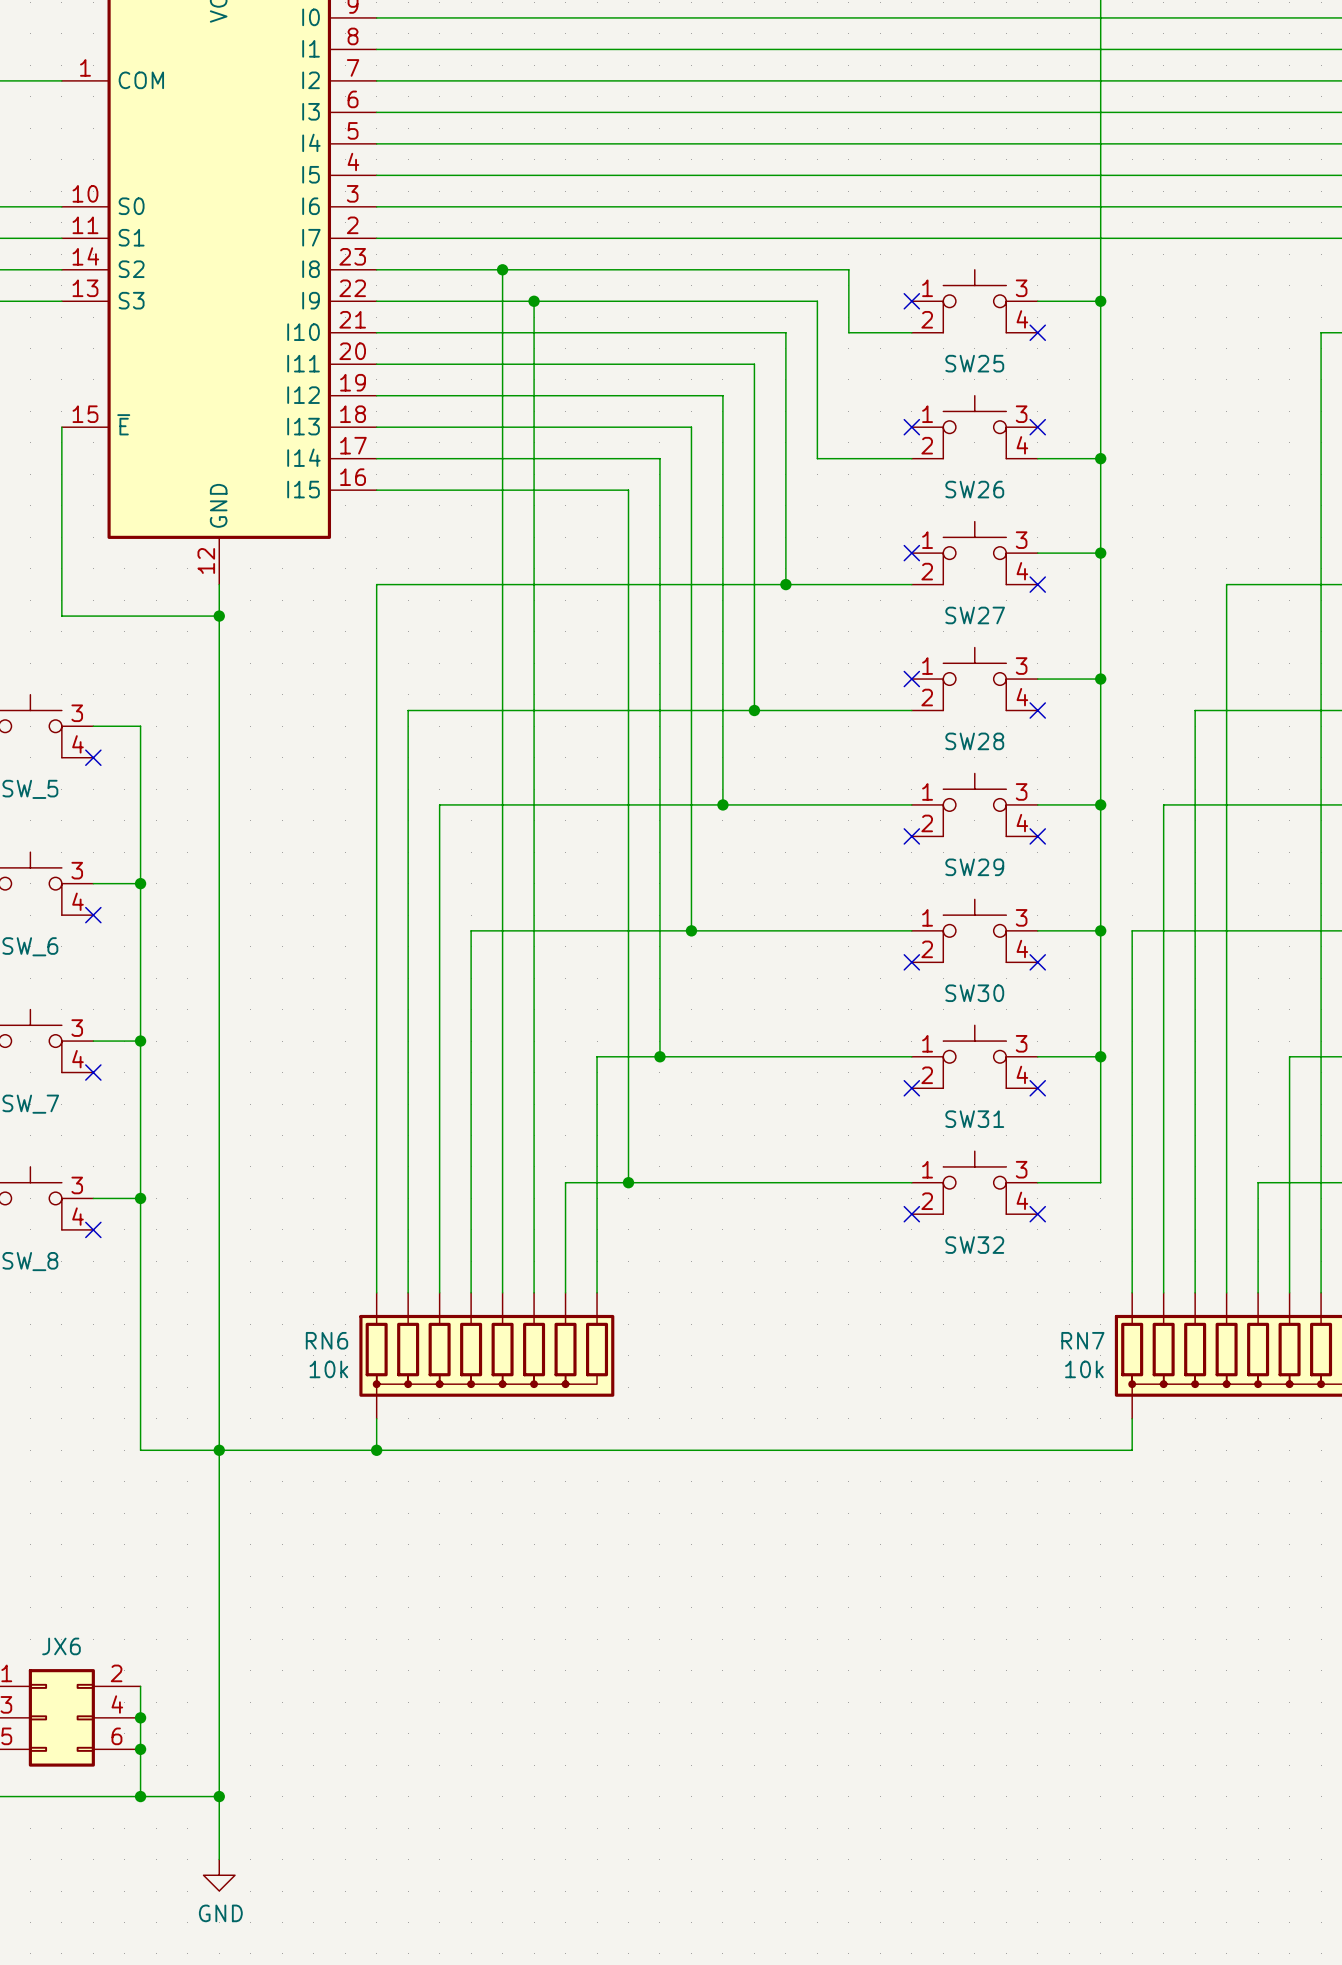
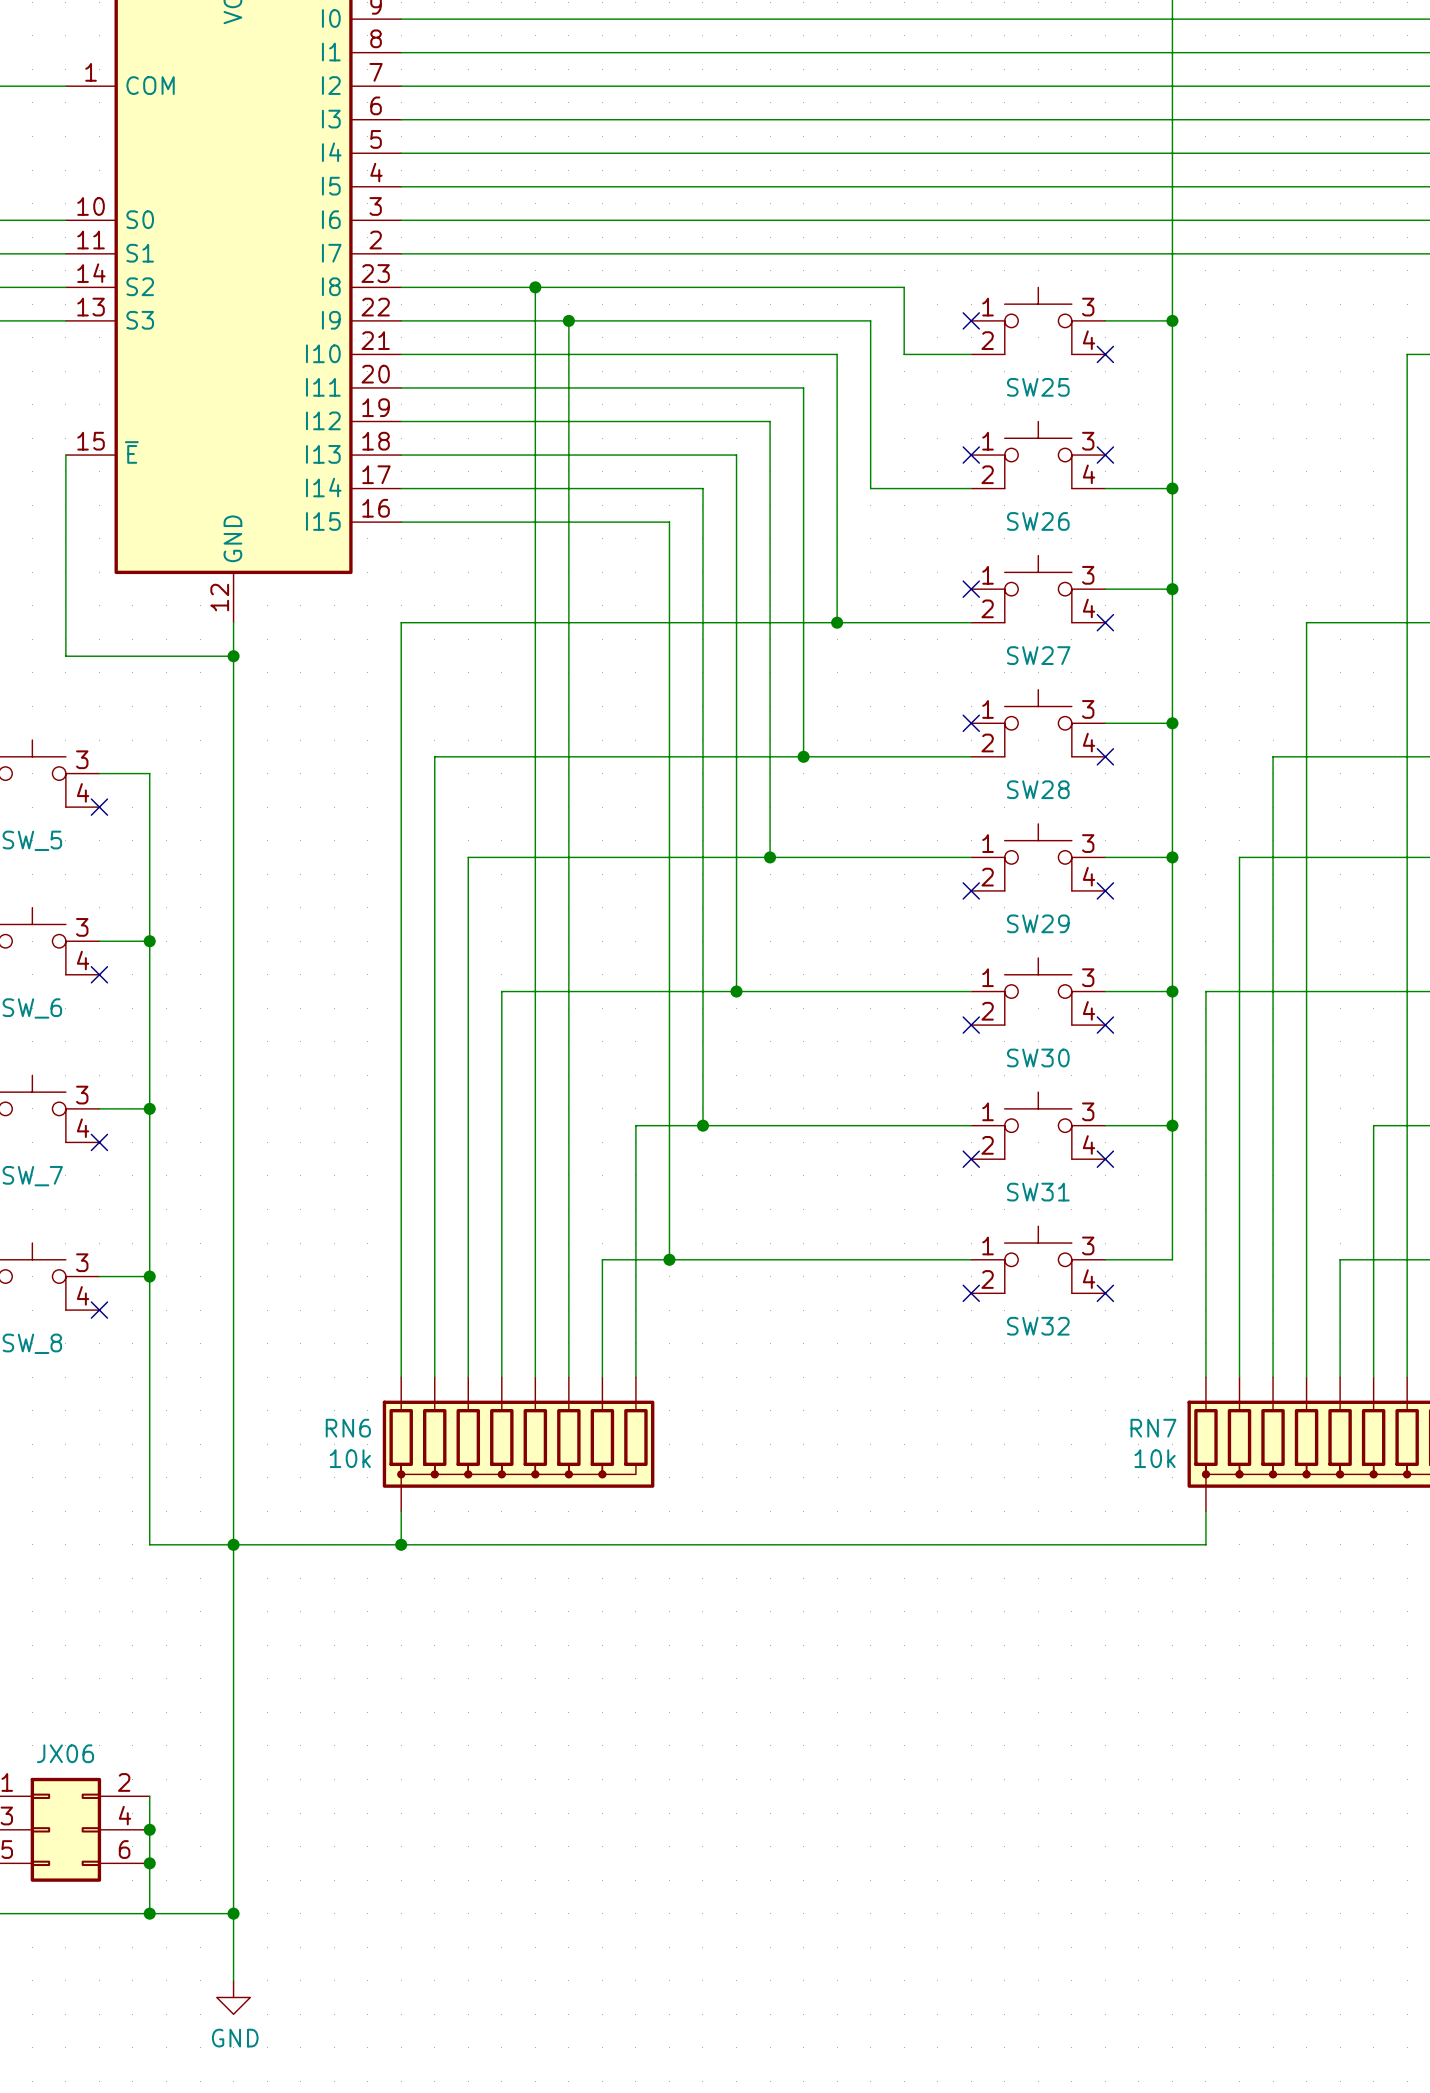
JX6 name: JX6 (61, 1646) -> JX06 (65, 1753)

